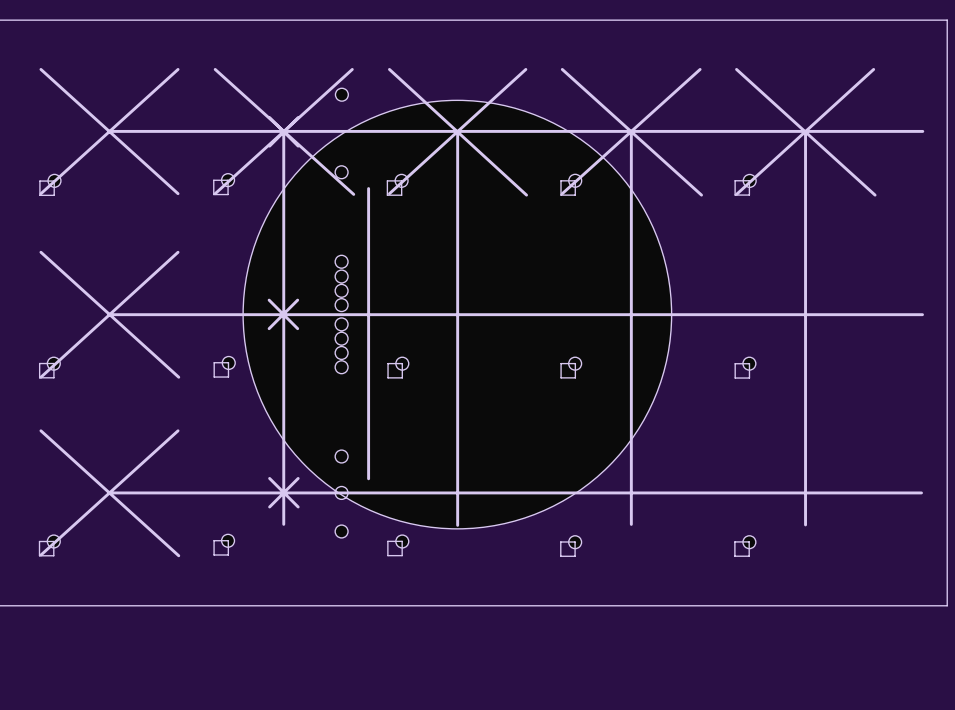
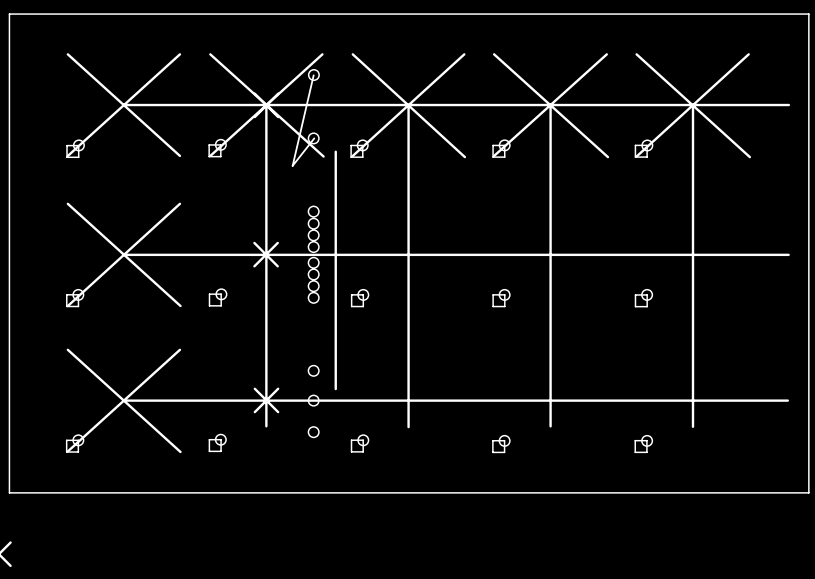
board edge: none -> (313, 75) (292, 165) (314, 138)
hole: (457, 314) -> none

